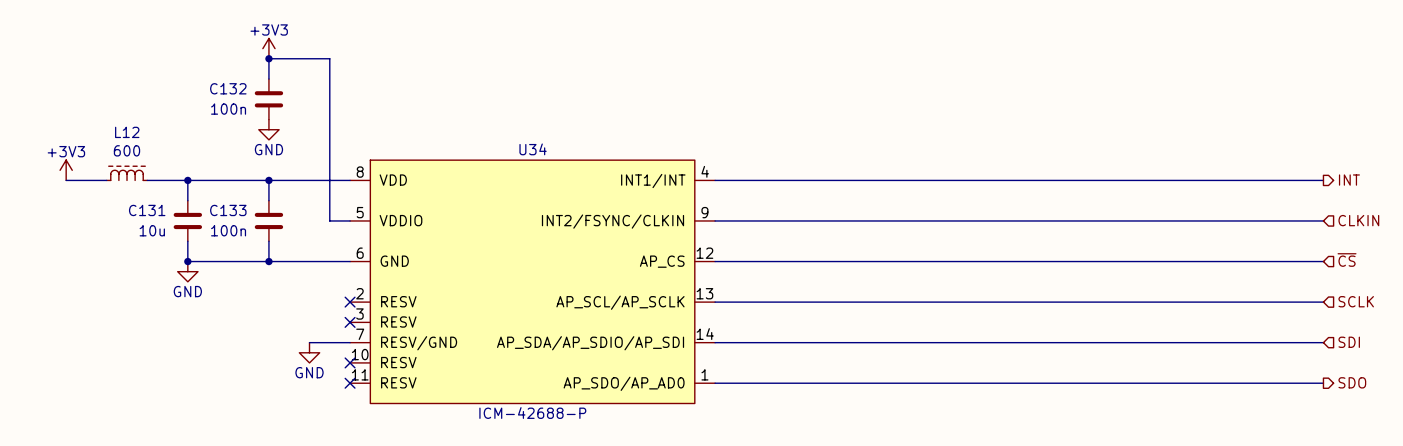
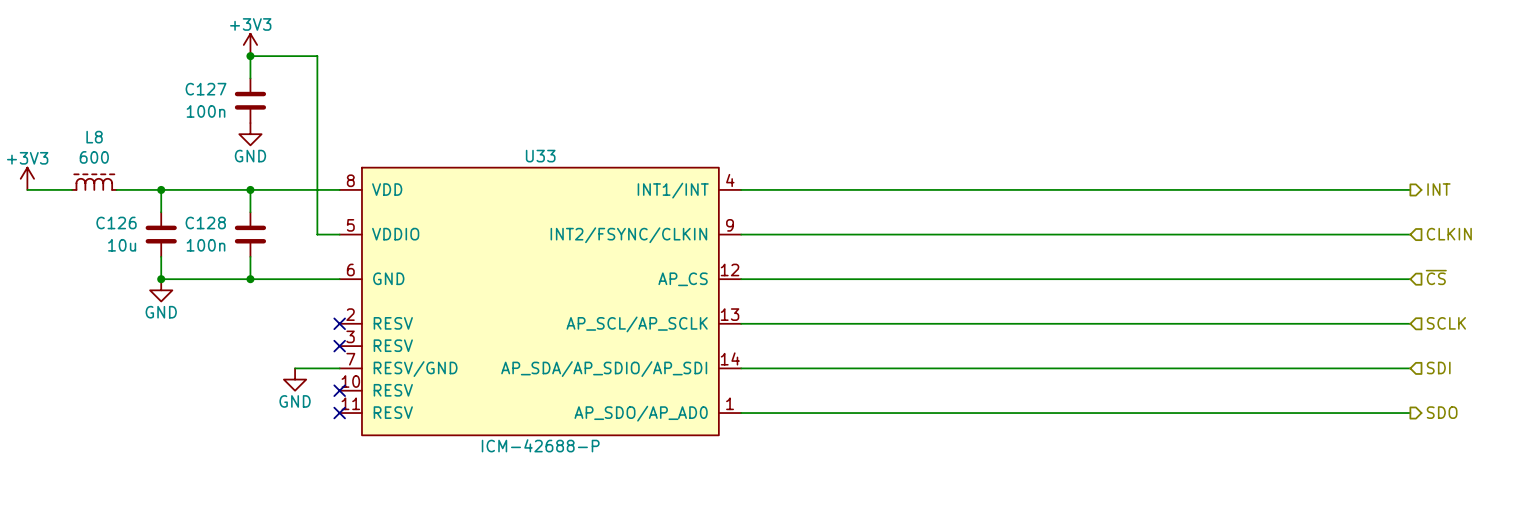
C132 name: C132 (228, 88) -> C127 (206, 89)
L12 name: L12 (127, 132) -> L8 (94, 137)
U34 name: U34 (533, 149) -> U33 (540, 156)
C131 name: C131 (147, 210) -> C126 (116, 223)
C133 name: C133 (228, 210) -> C128 (205, 223)

